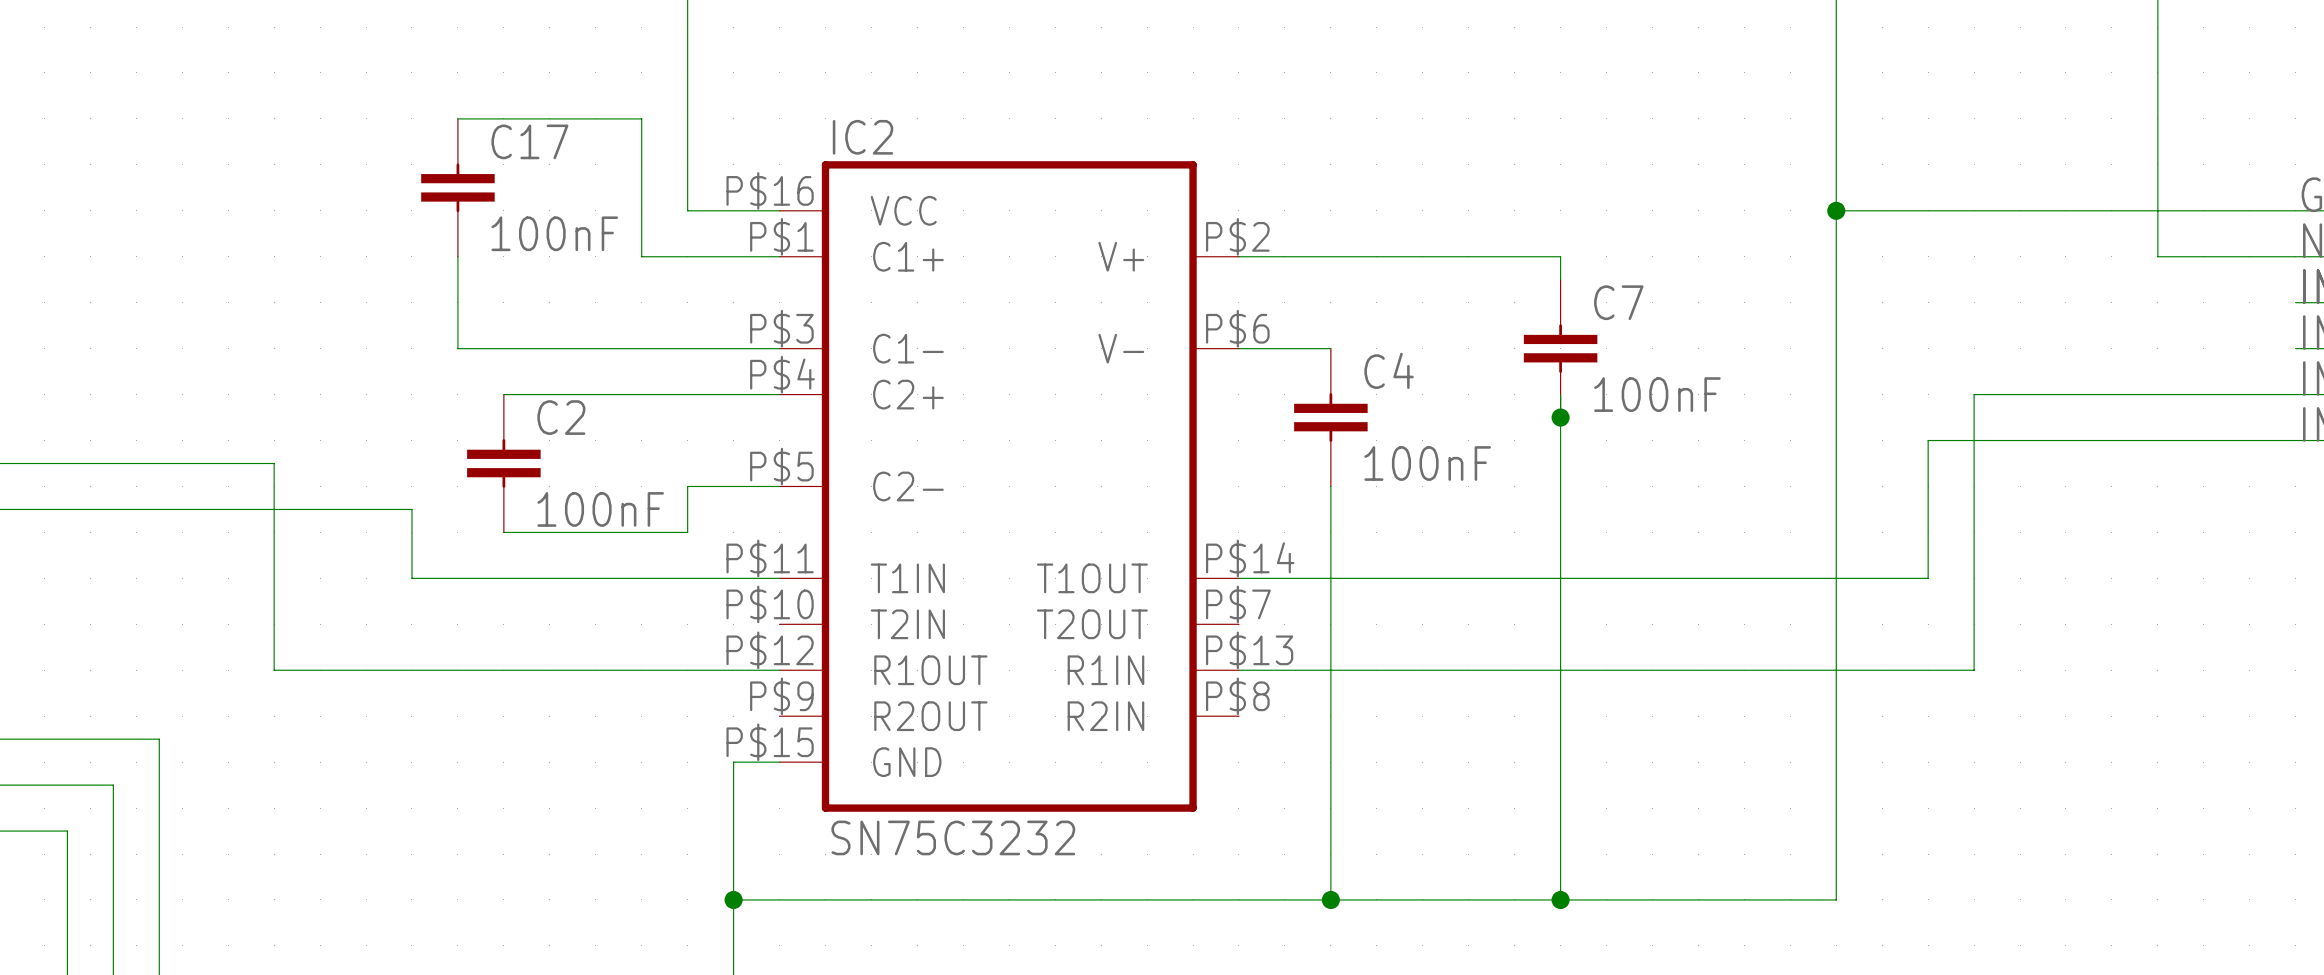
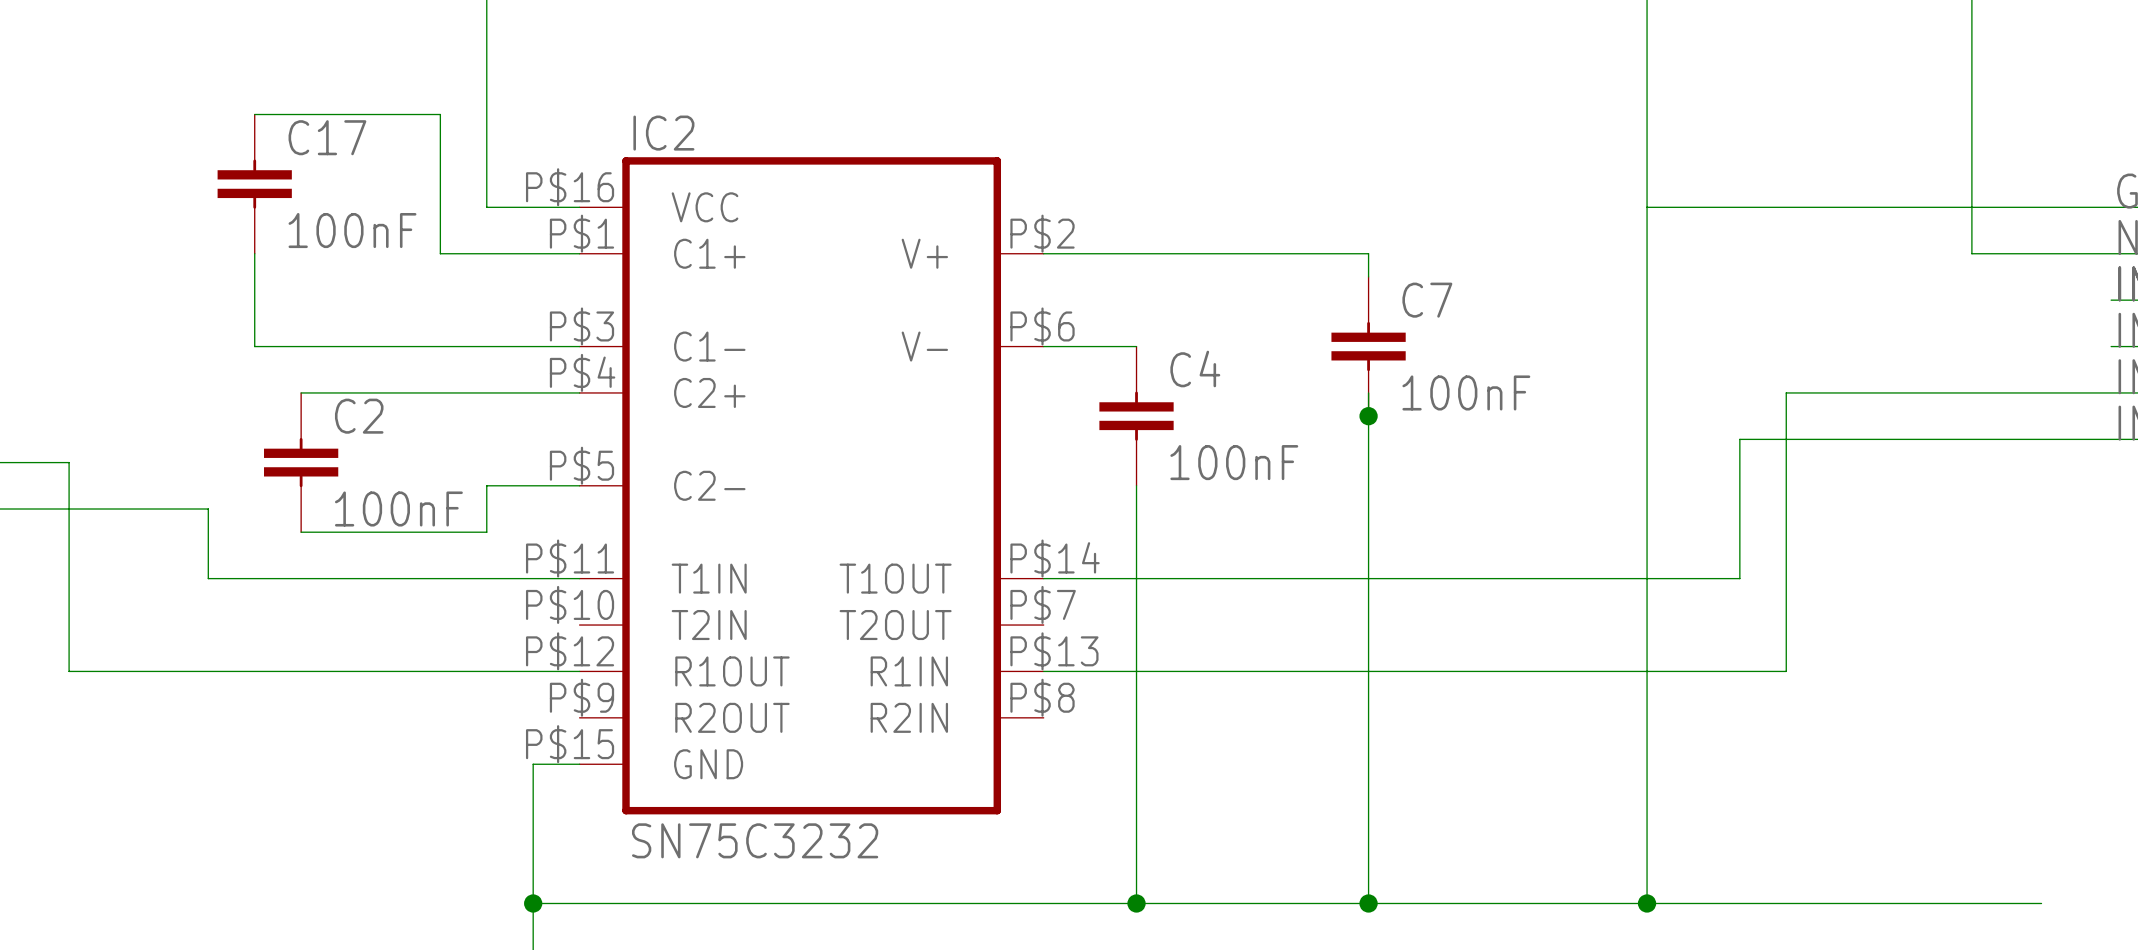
junction: (1836, 210) -> none
wire: none -> (1647, 903) (2041, 903)
junction: none -> (1647, 903)

